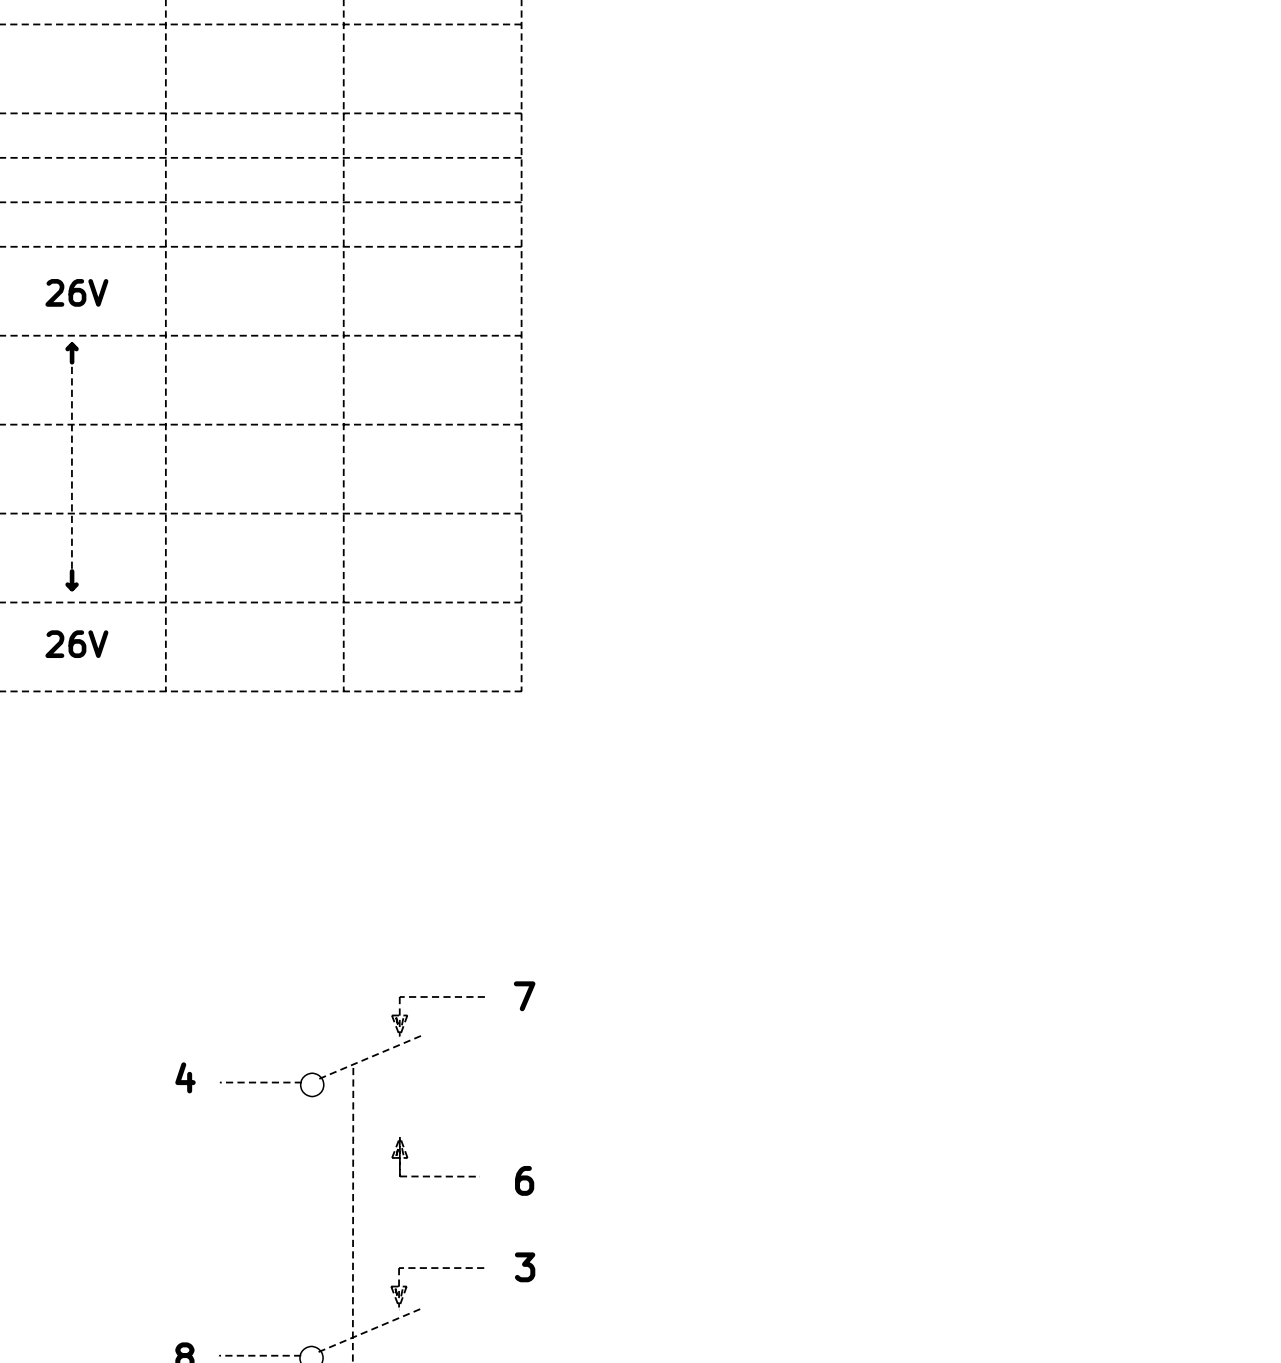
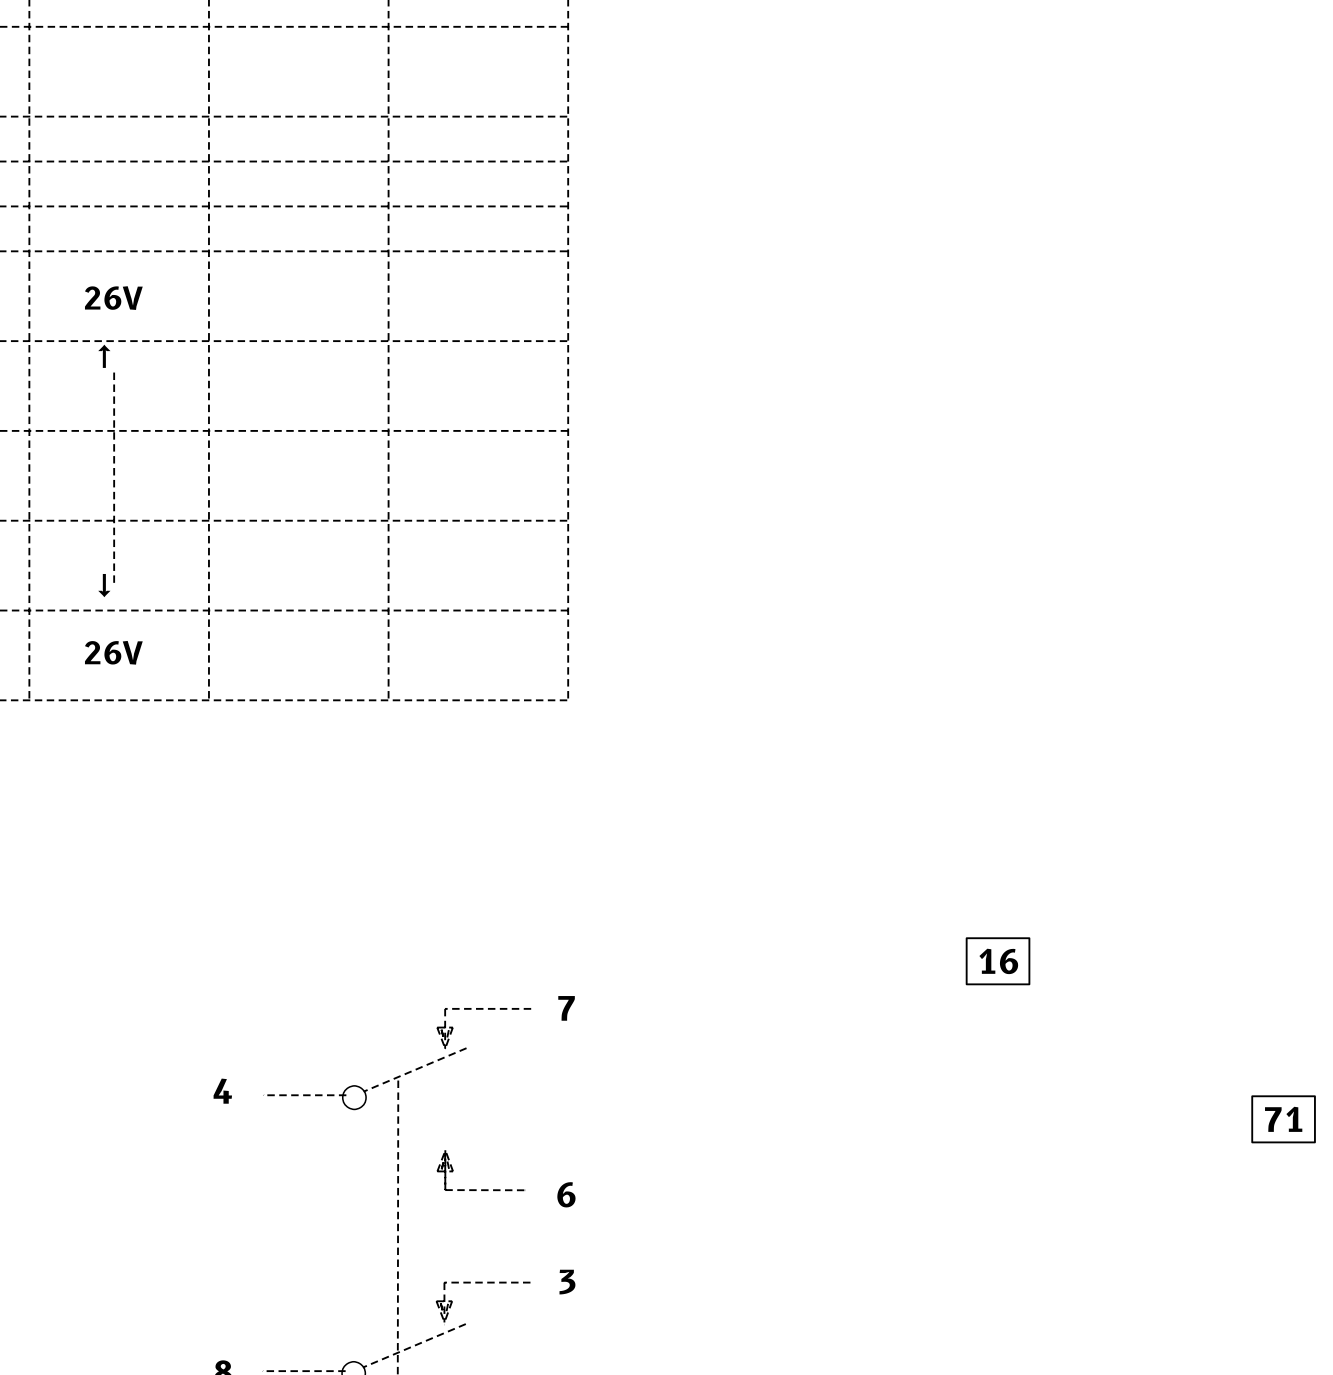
global label: none -> 16 (998, 961)
global label: none -> 71 (1283, 1119)

